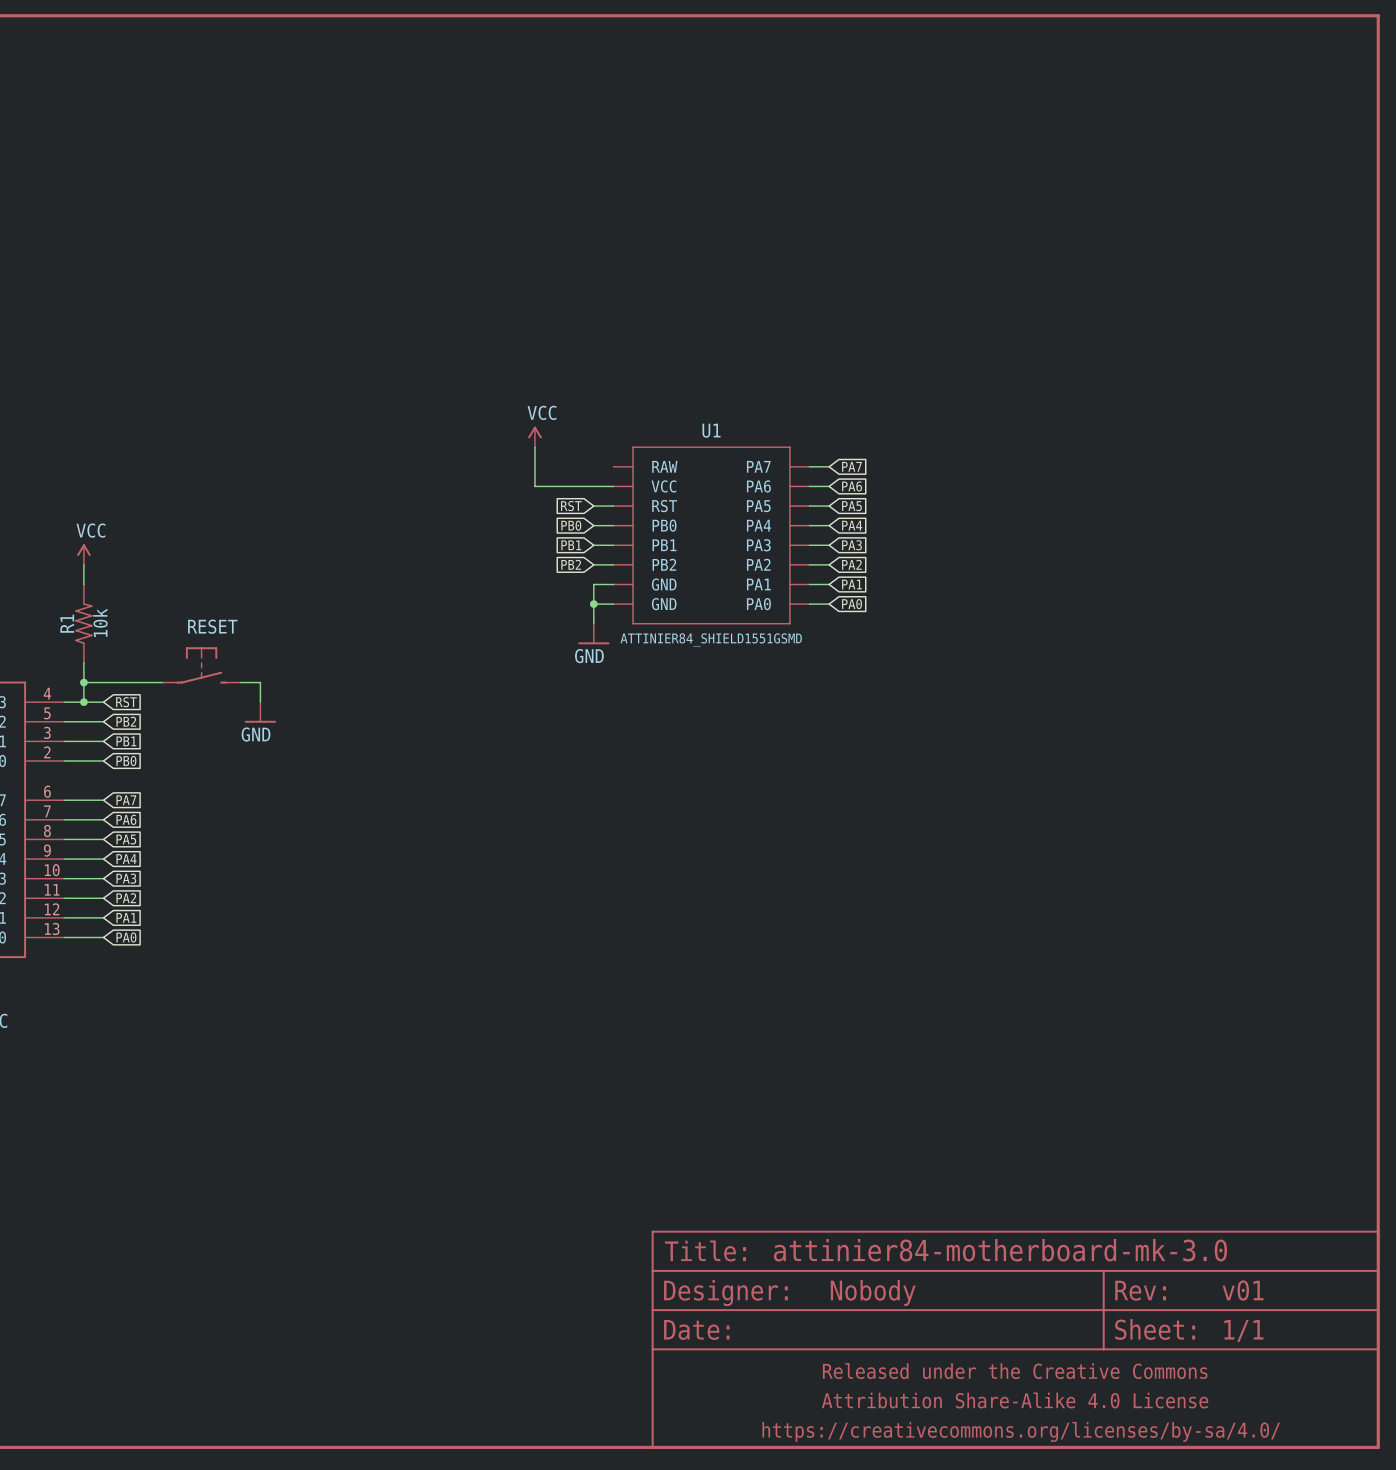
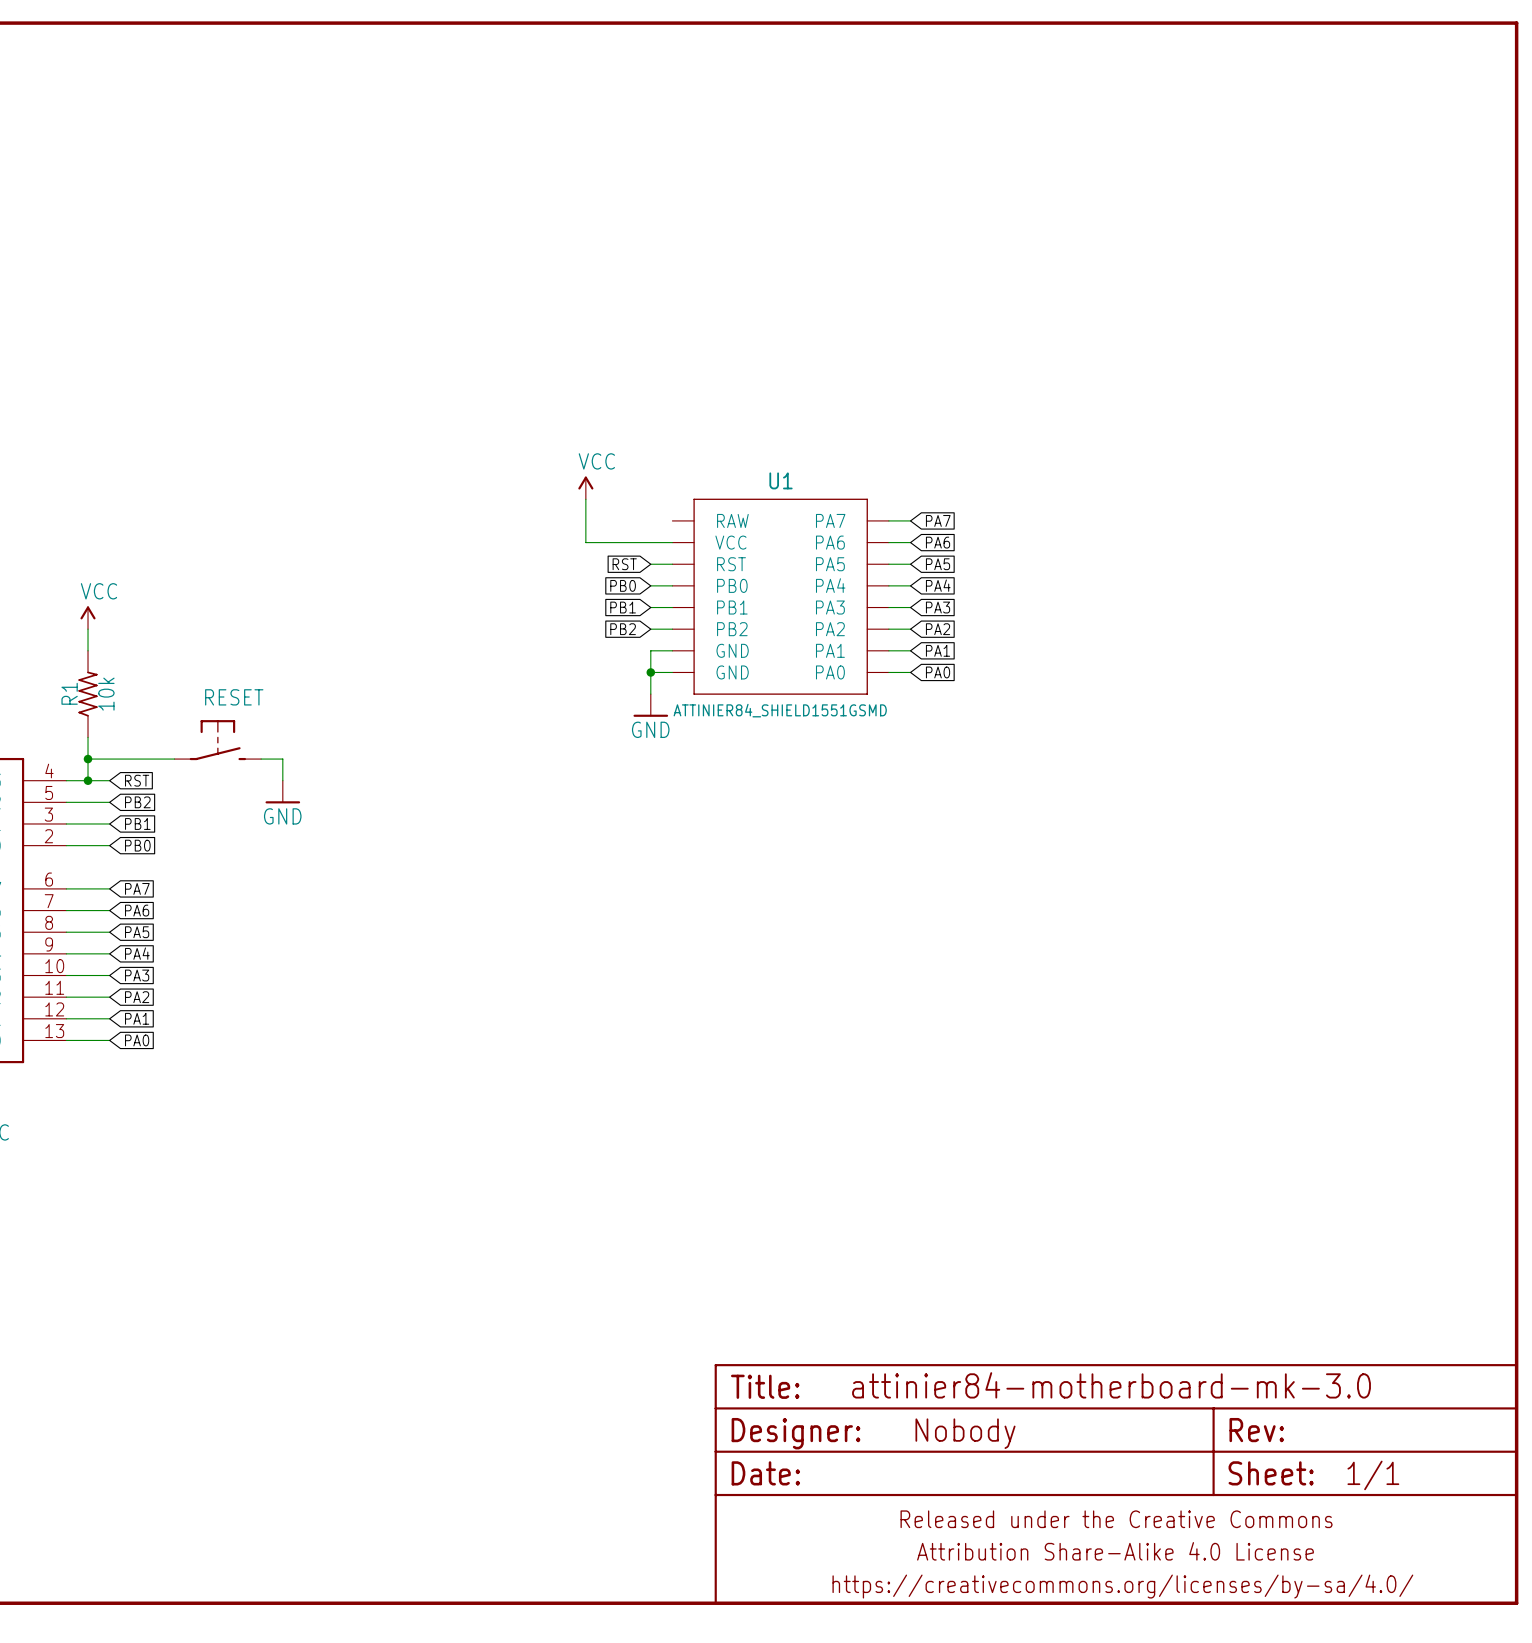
part text: v01 (1243, 1290) -> none

